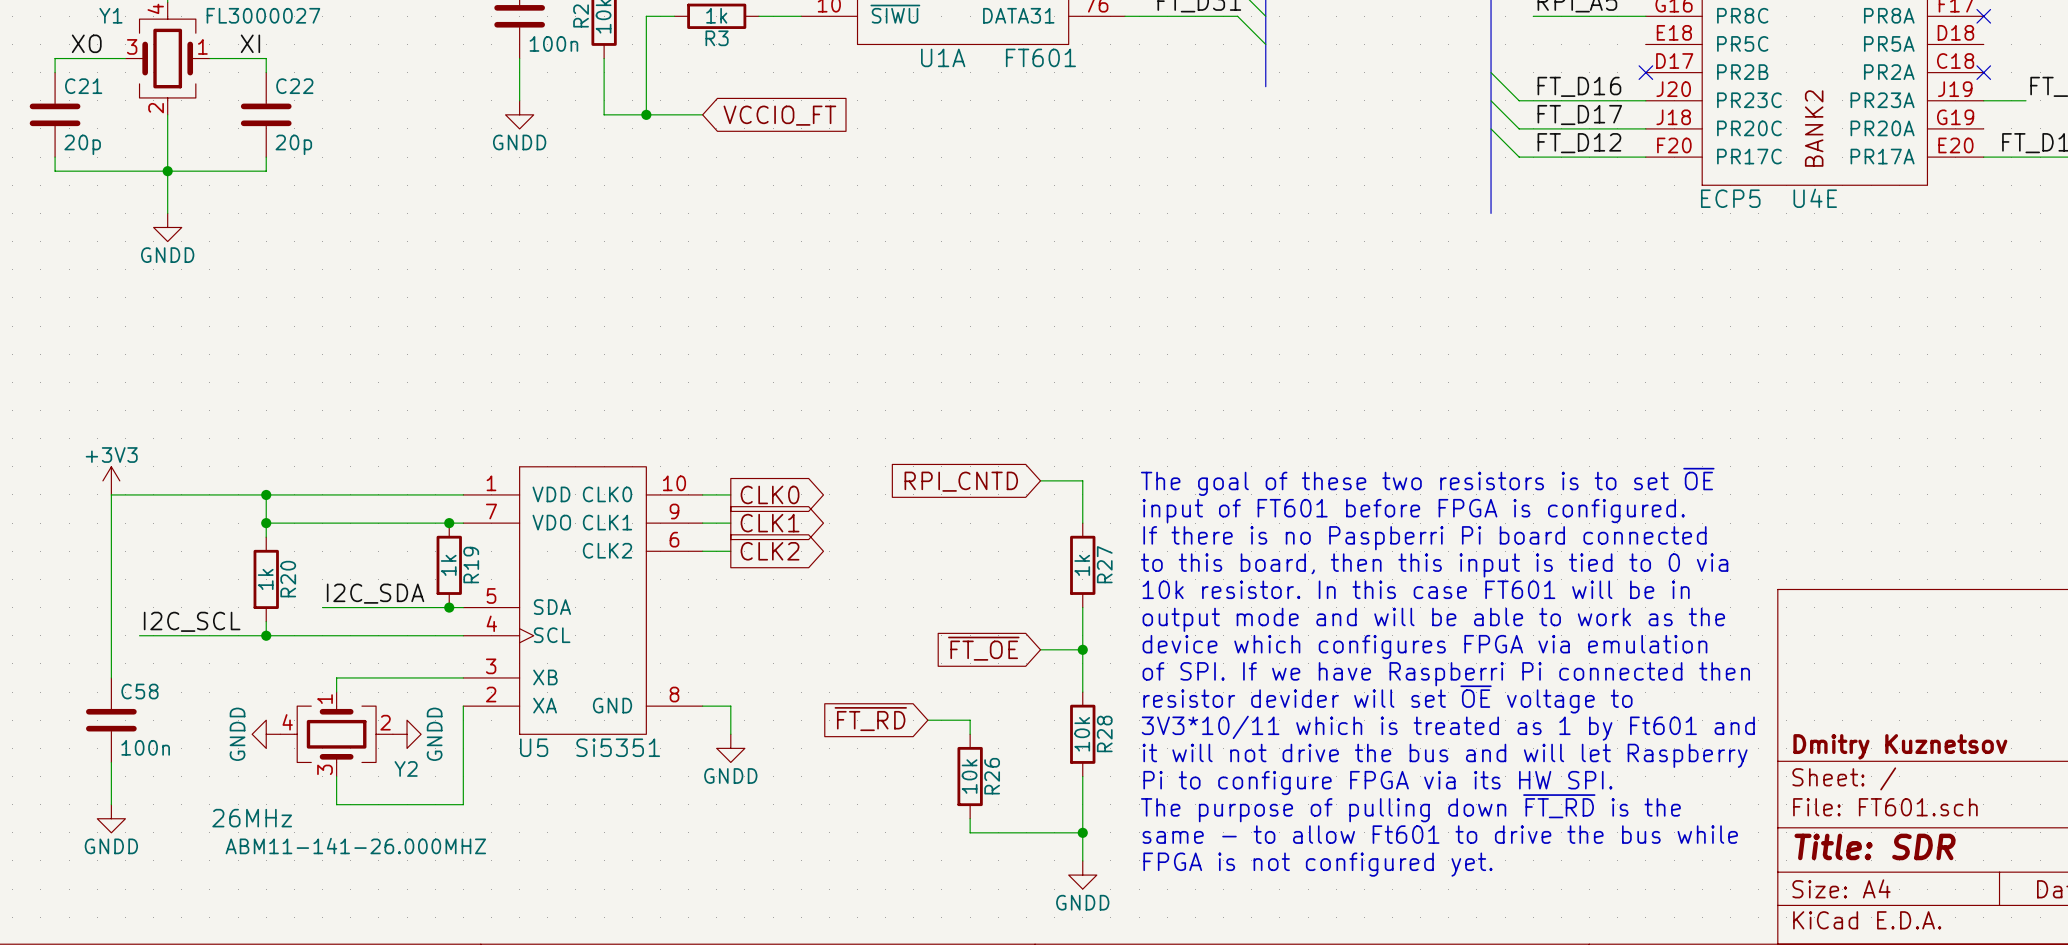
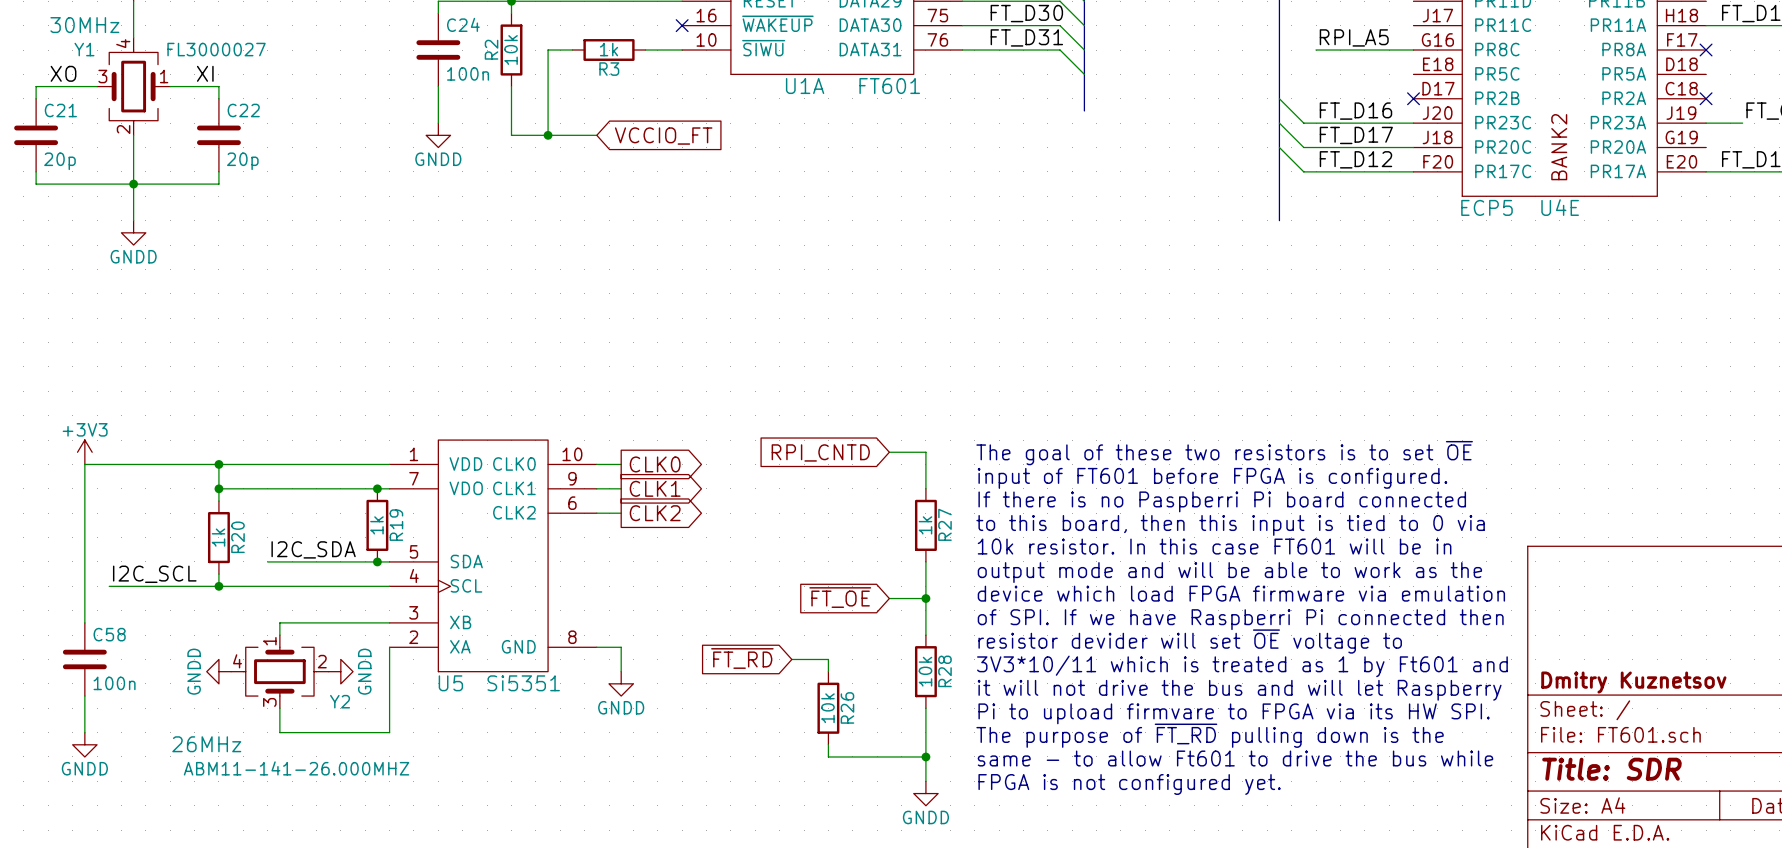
text: device which configures FPGA via emulation (1424, 647) -> device which load FPGA firmware via emulation (1241, 593)
text: Pi to configure FPGA via its HW SPI. (1377, 783) -> Pi to upload firmvare to FPGA via its HW SPI. (1234, 713)
text: The purpose of pulling down ~{FT_RD} is the (1410, 808) -> The purpose of ~{FT_RD} pulling down is the (1210, 735)

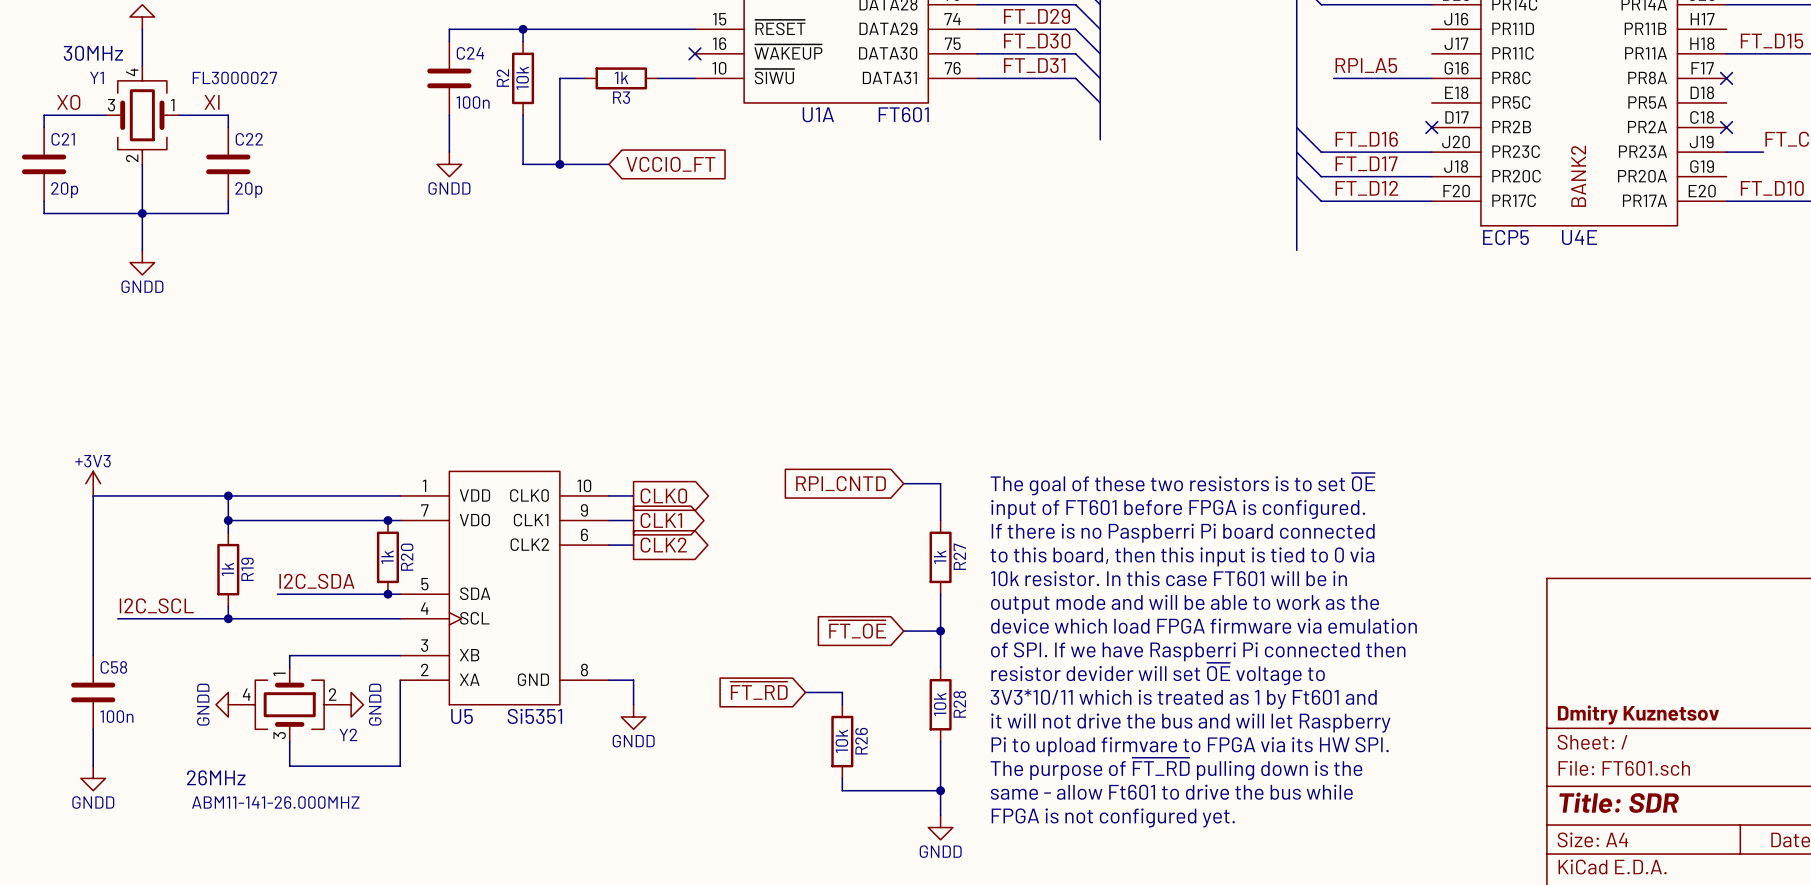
R19 name: R19 (396, 525) -> R20 (407, 557)
R20 name: R20 (237, 537) -> R19 (247, 569)
text: same - to allow Ft601 to drive the bus while (1235, 758) -> same - allow Ft601 to drive the bus while (1171, 792)

